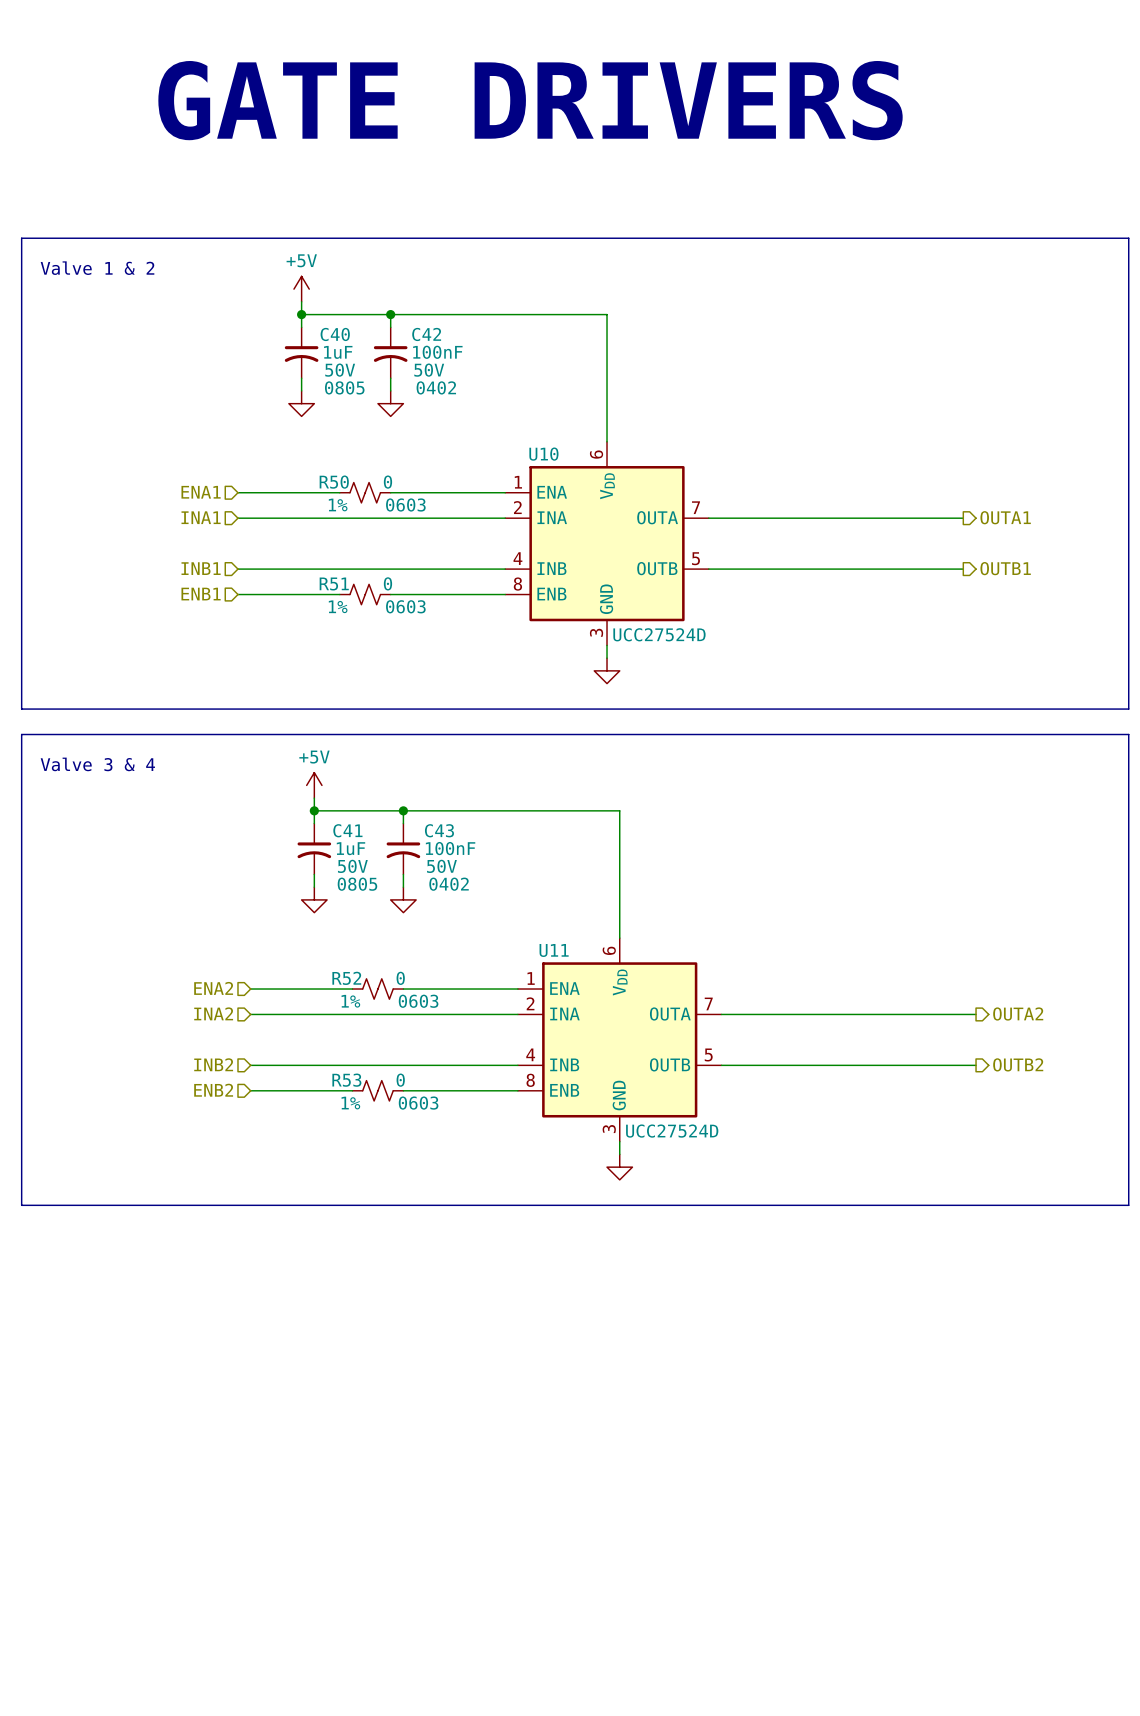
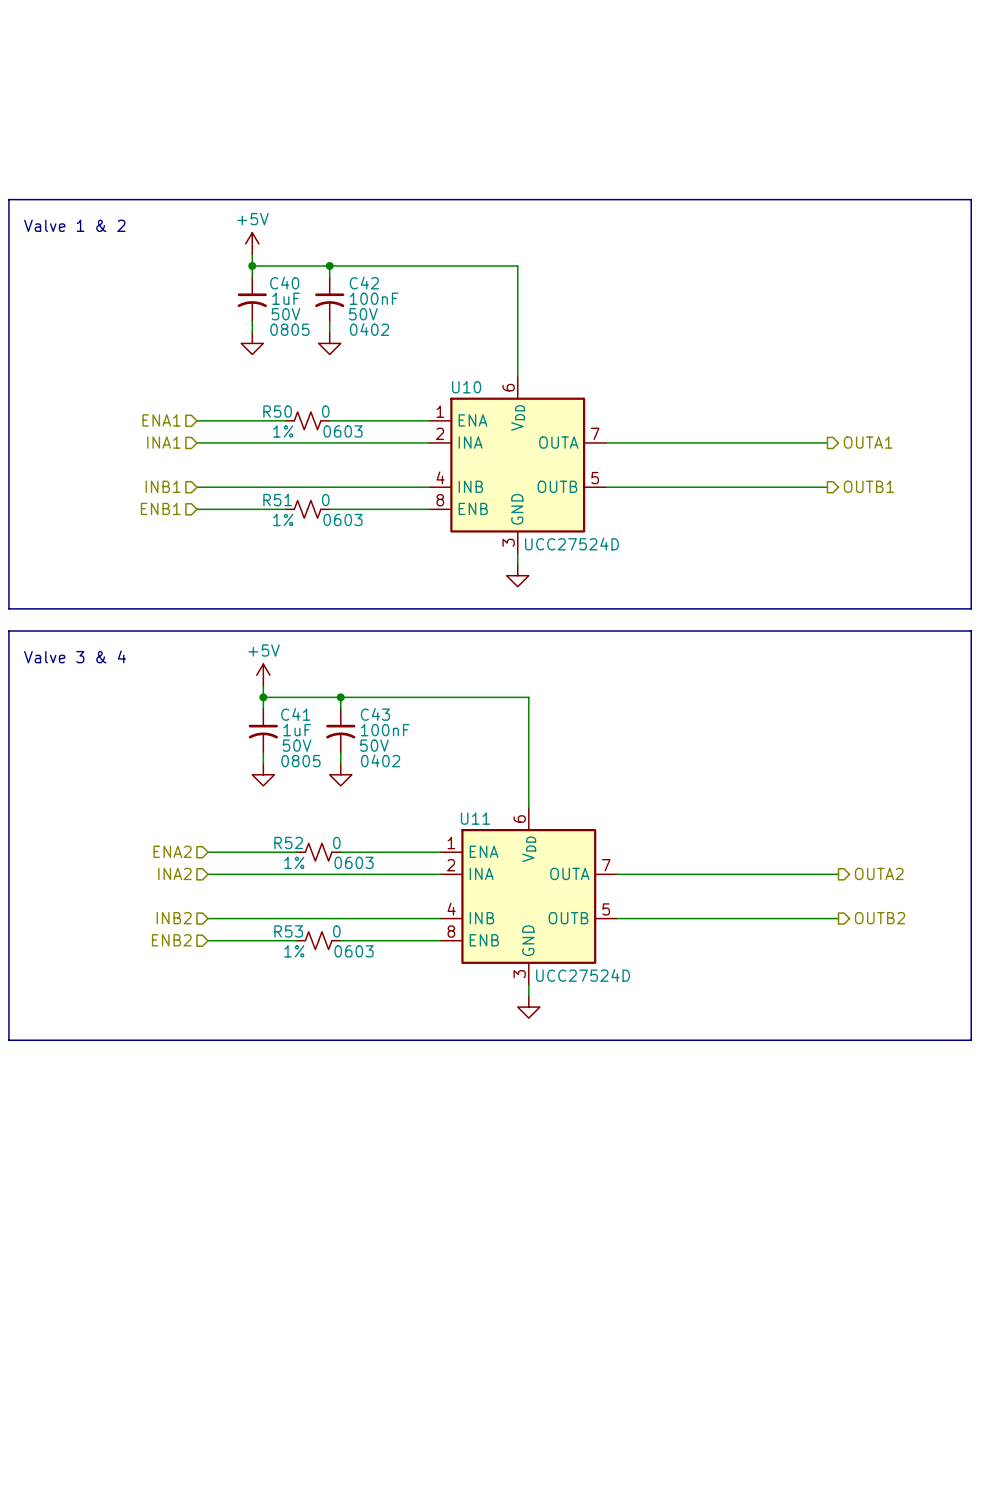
text: GATE DRIVERS (530, 100) -> none

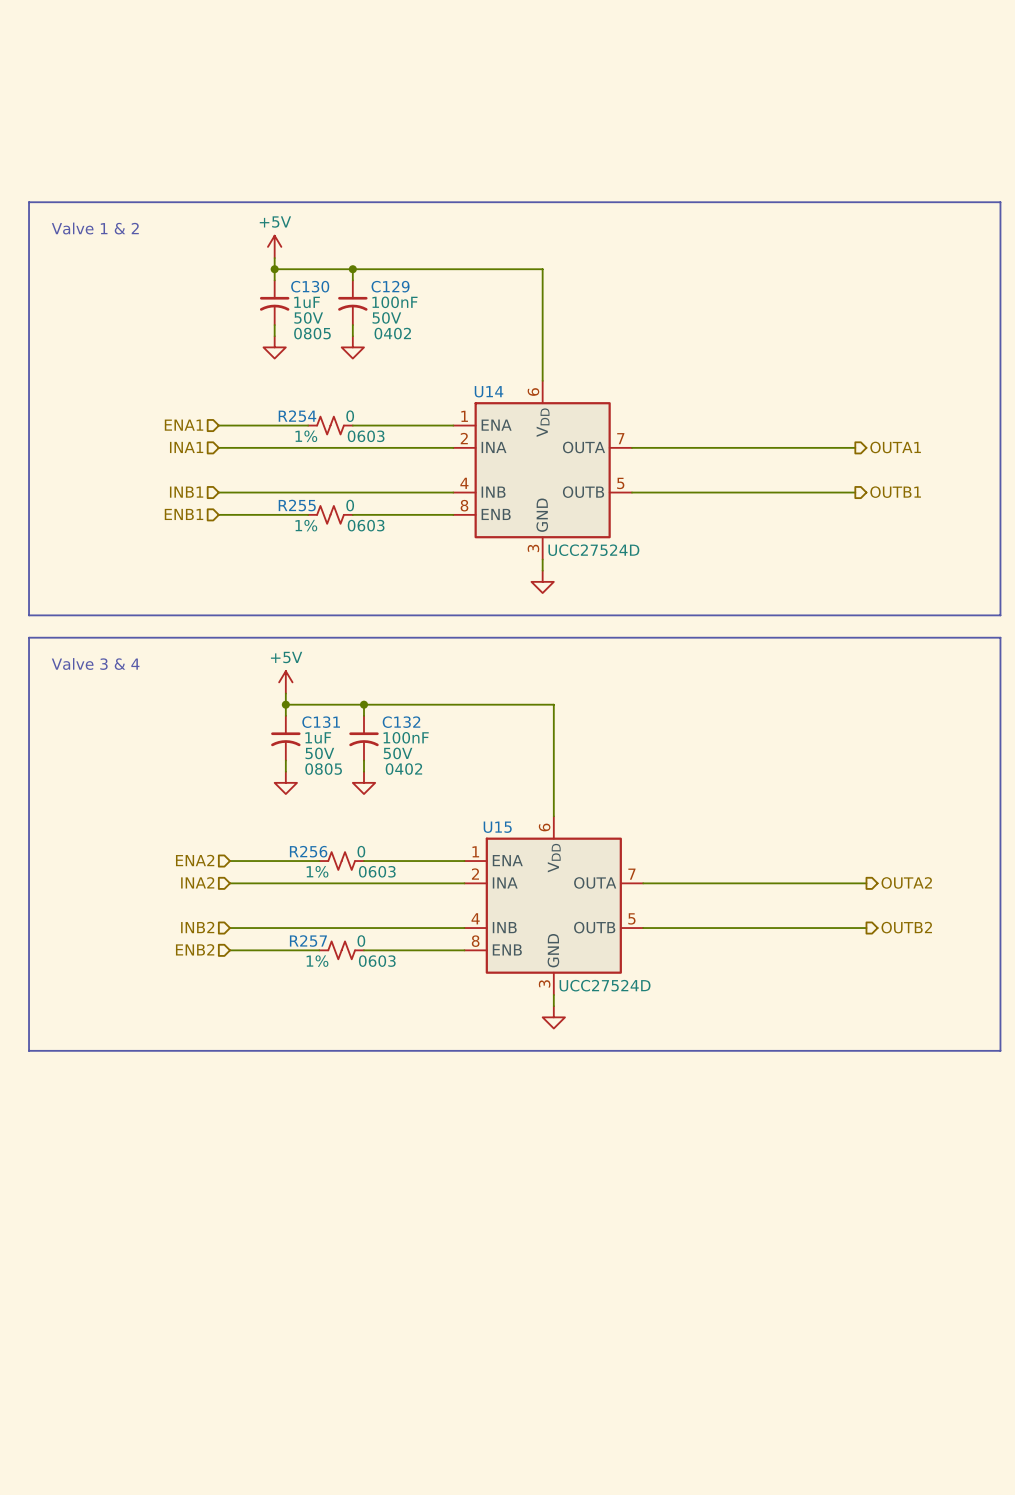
C40 name: C40 (284, 283) -> C130 (310, 286)
C42 name: C42 (364, 283) -> C129 (390, 286)
U10 name: U10 (466, 387) -> U14 (489, 391)
R50 name: R50 (277, 411) -> R254 (297, 416)
R51 name: R51 (277, 500) -> R255 (297, 505)
C41 name: C41 (295, 714) -> C131 (321, 722)
C43 name: C43 (375, 714) -> C132 (401, 722)
U11 name: U11 (475, 818) -> U15 (497, 827)
R52 name: R52 (288, 842) -> R256 (308, 851)
R53 name: R53 (288, 931) -> R257 (308, 941)

